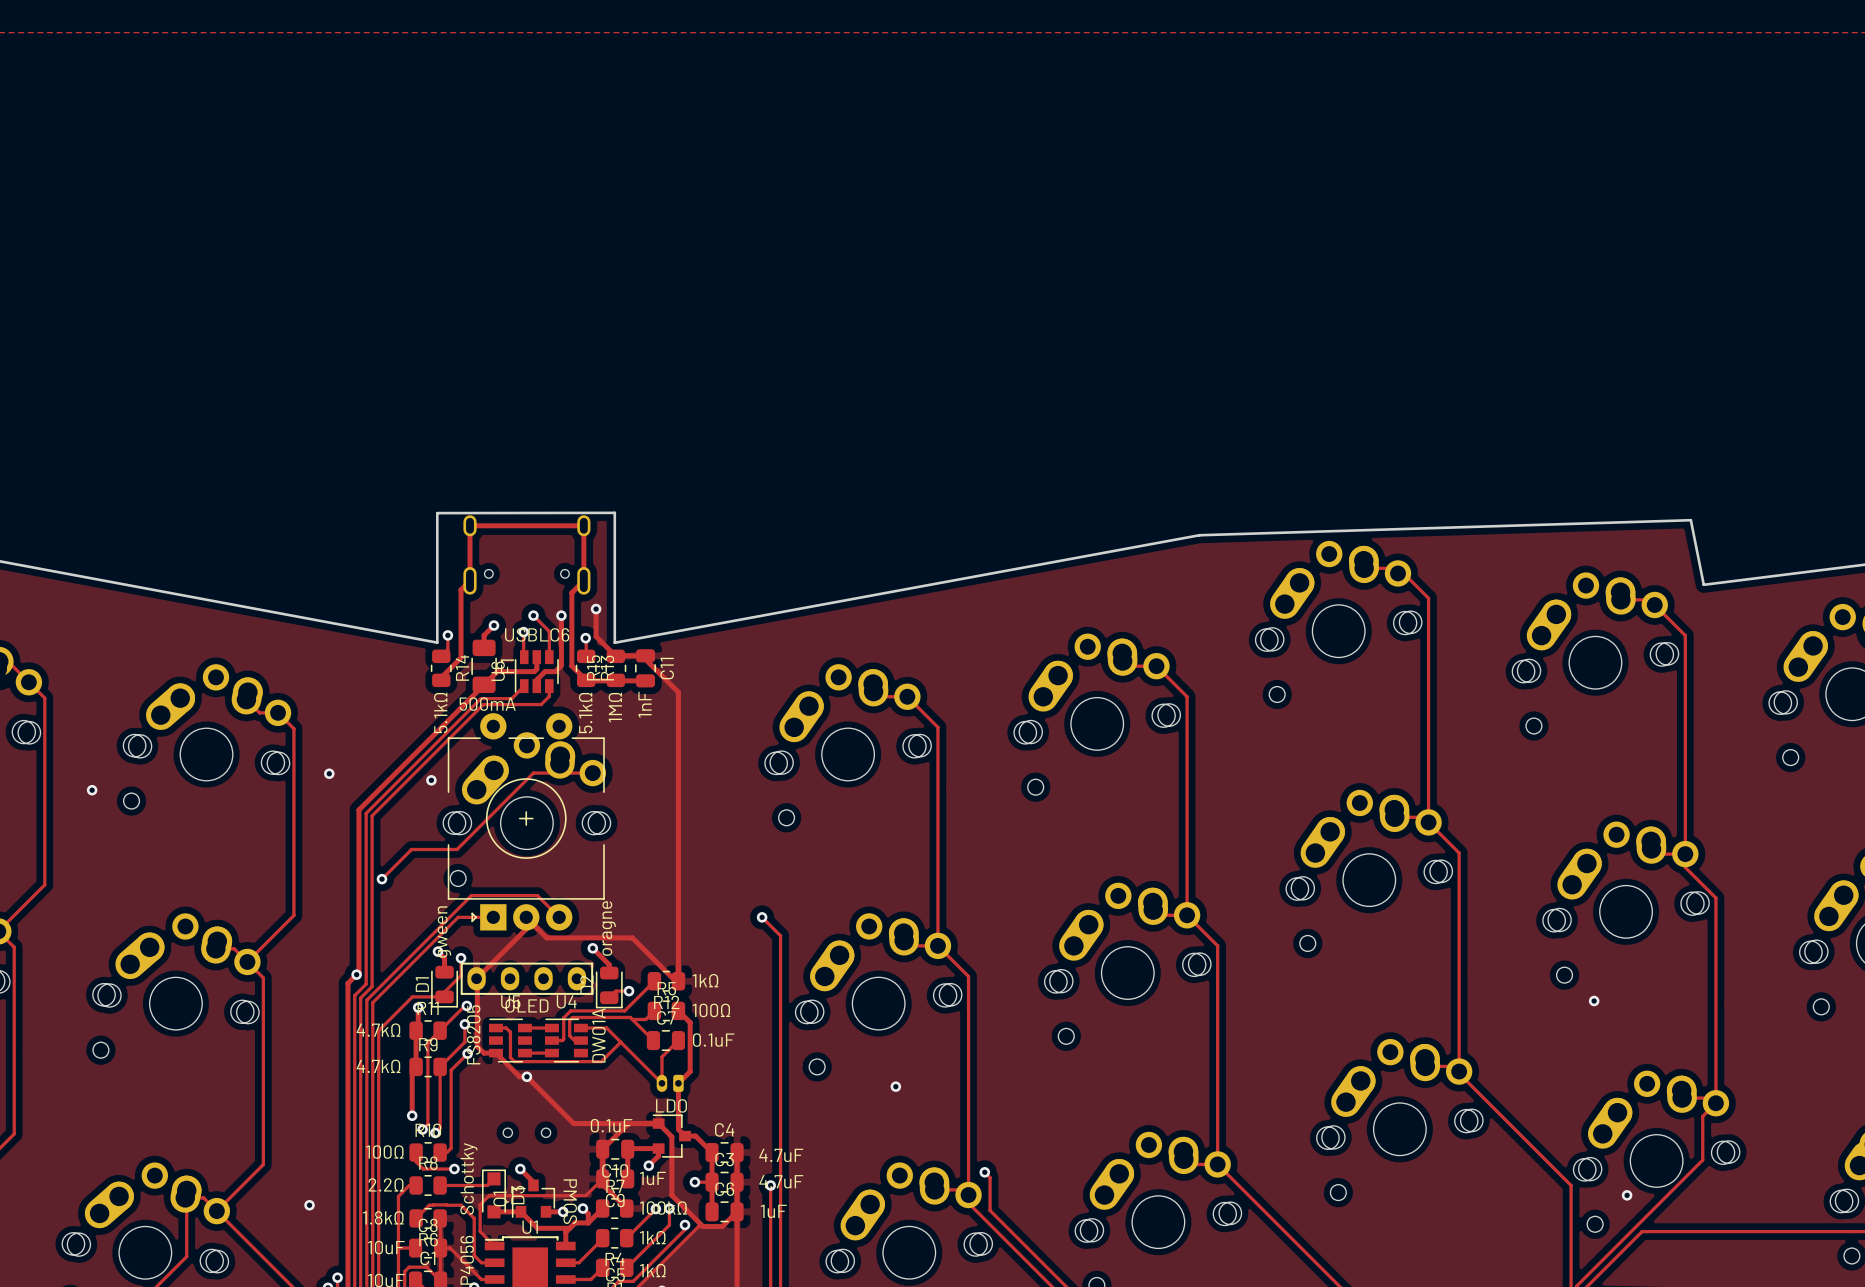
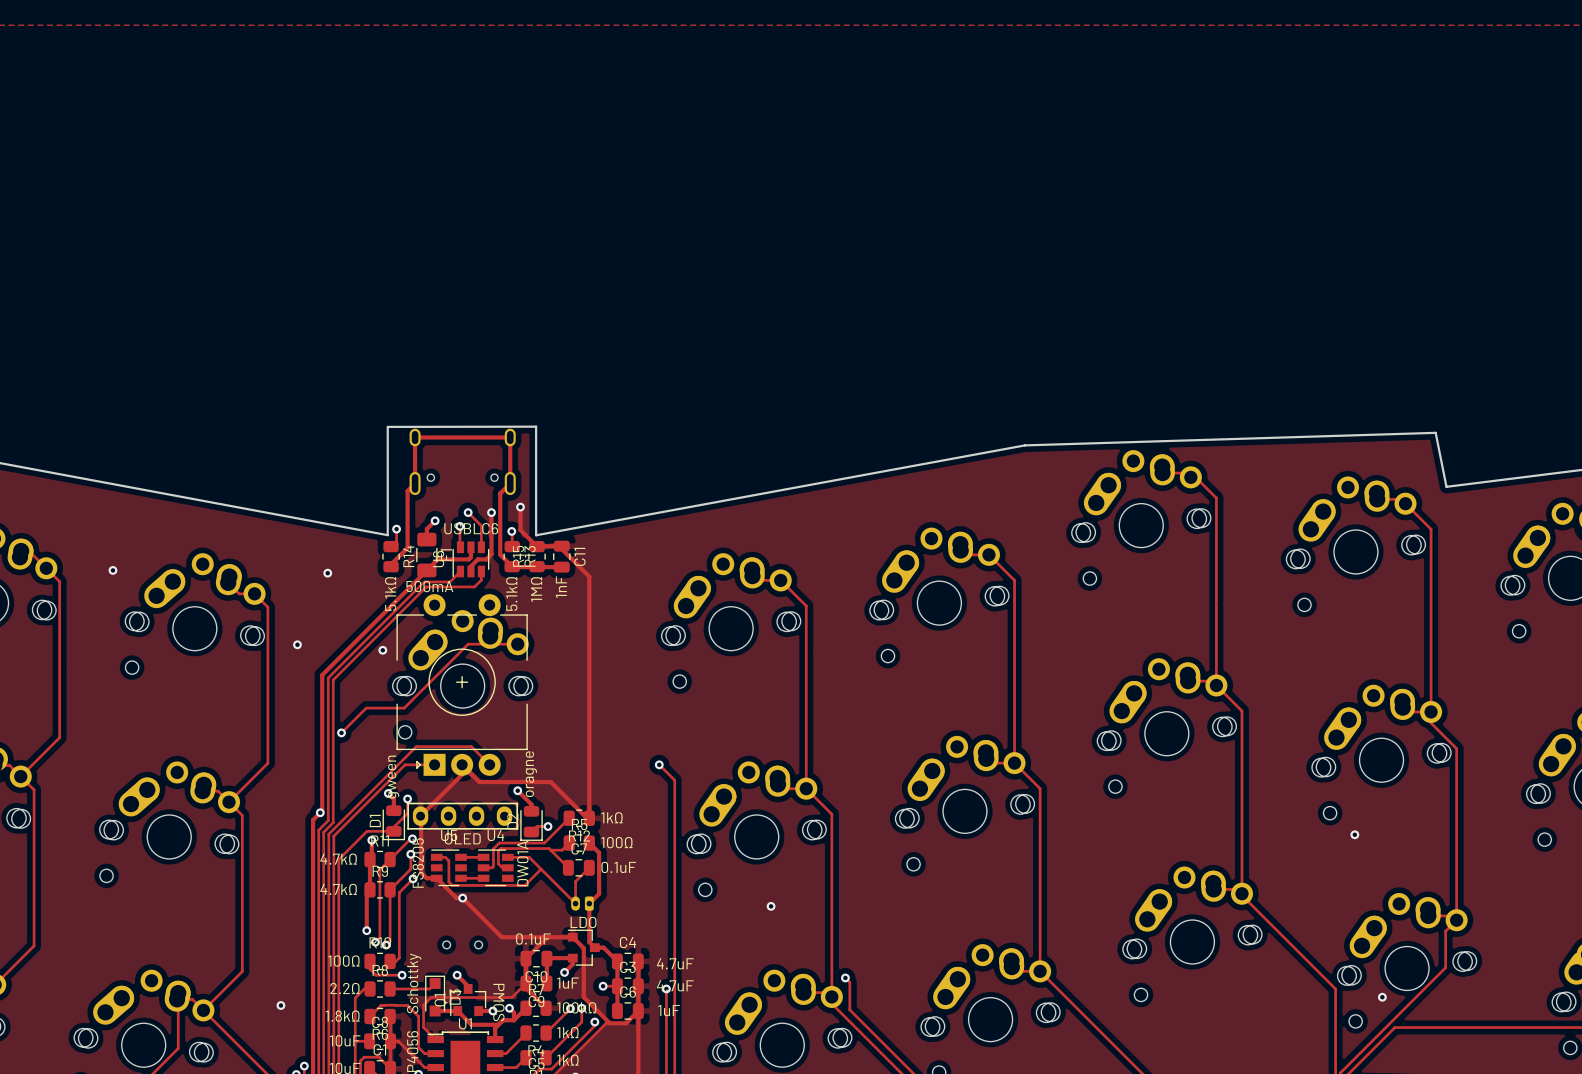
via: none -> (112, 570)
via: none -> (327, 573)
via: (92, 790) -> none

